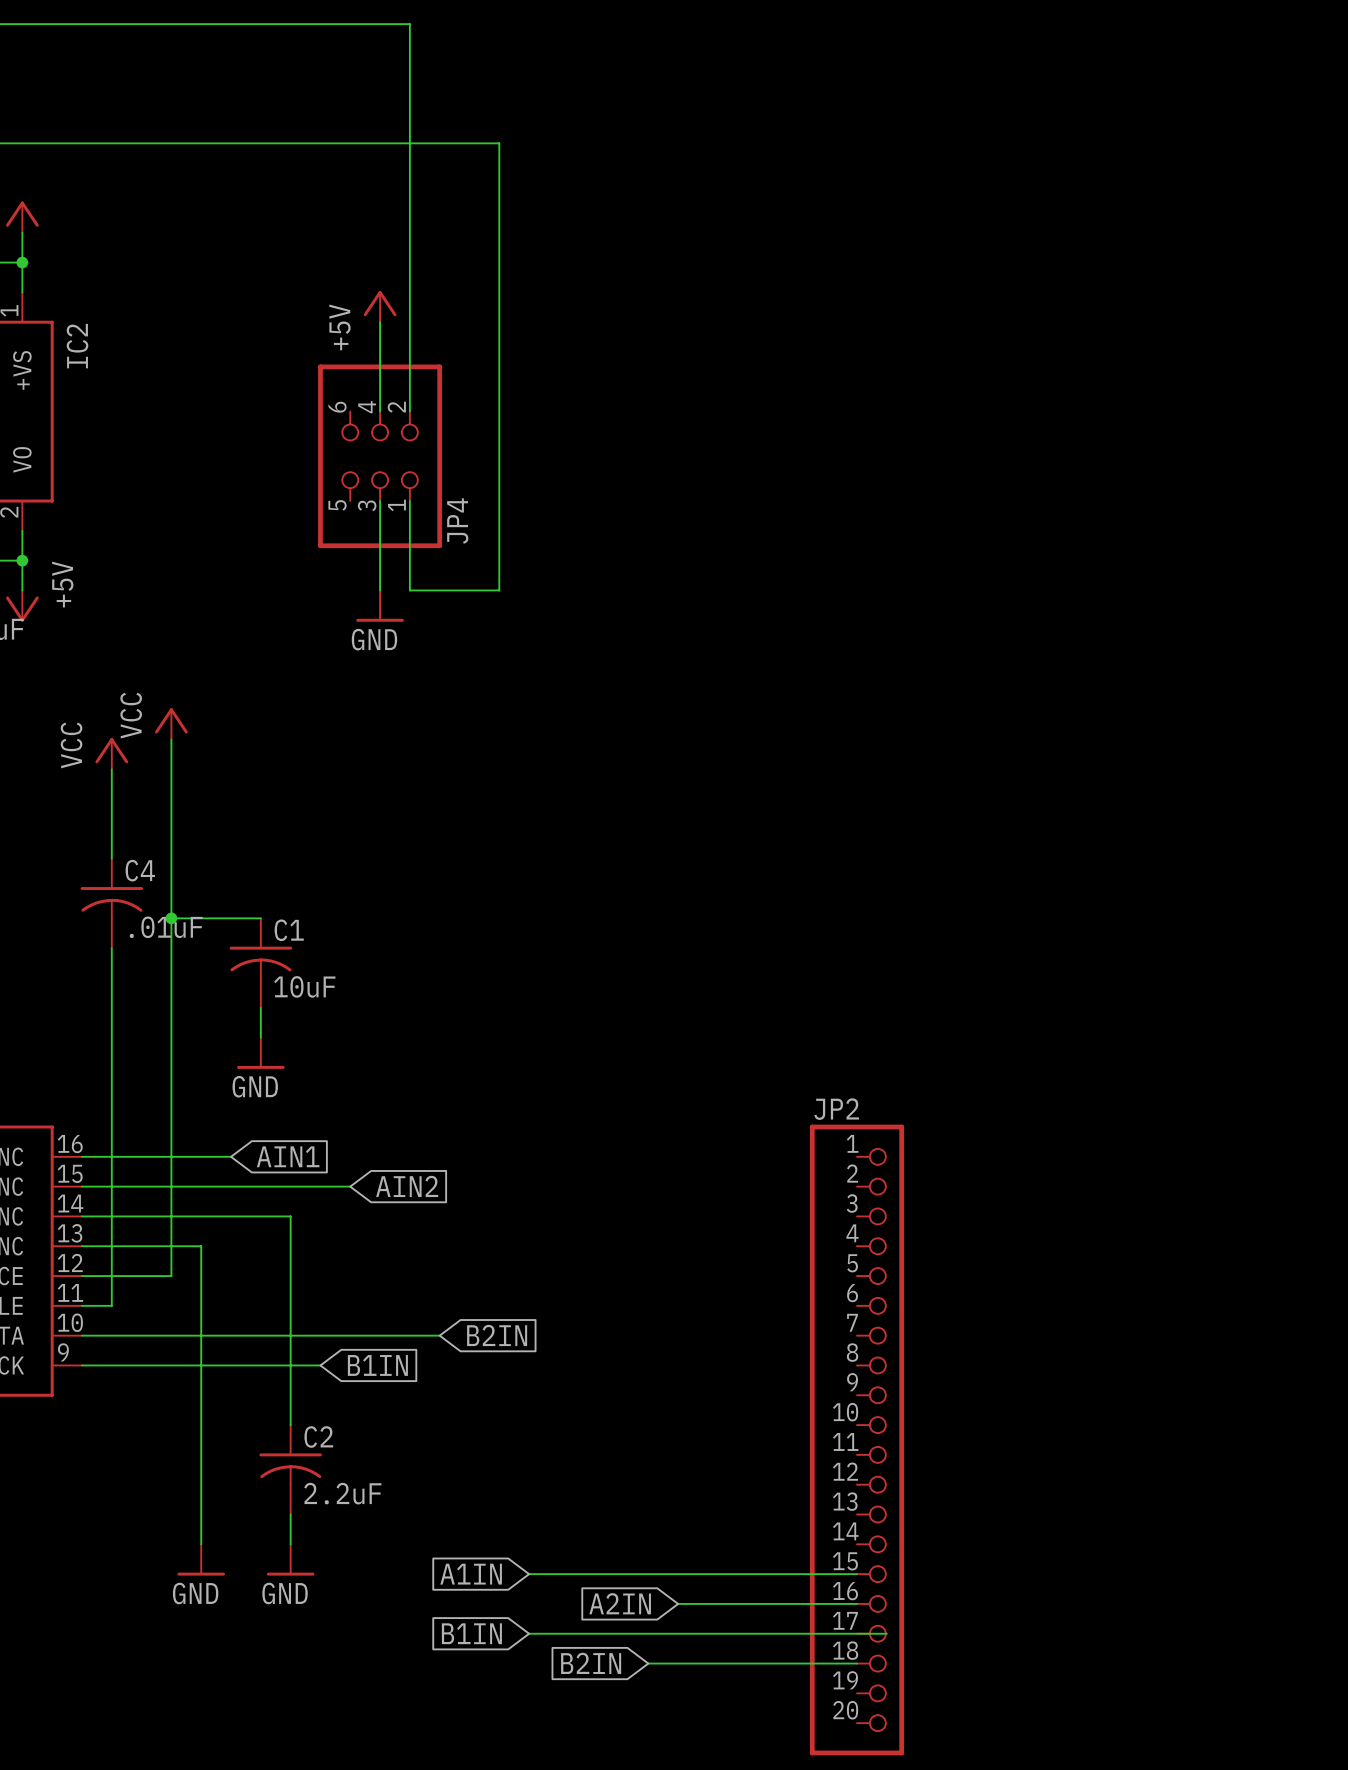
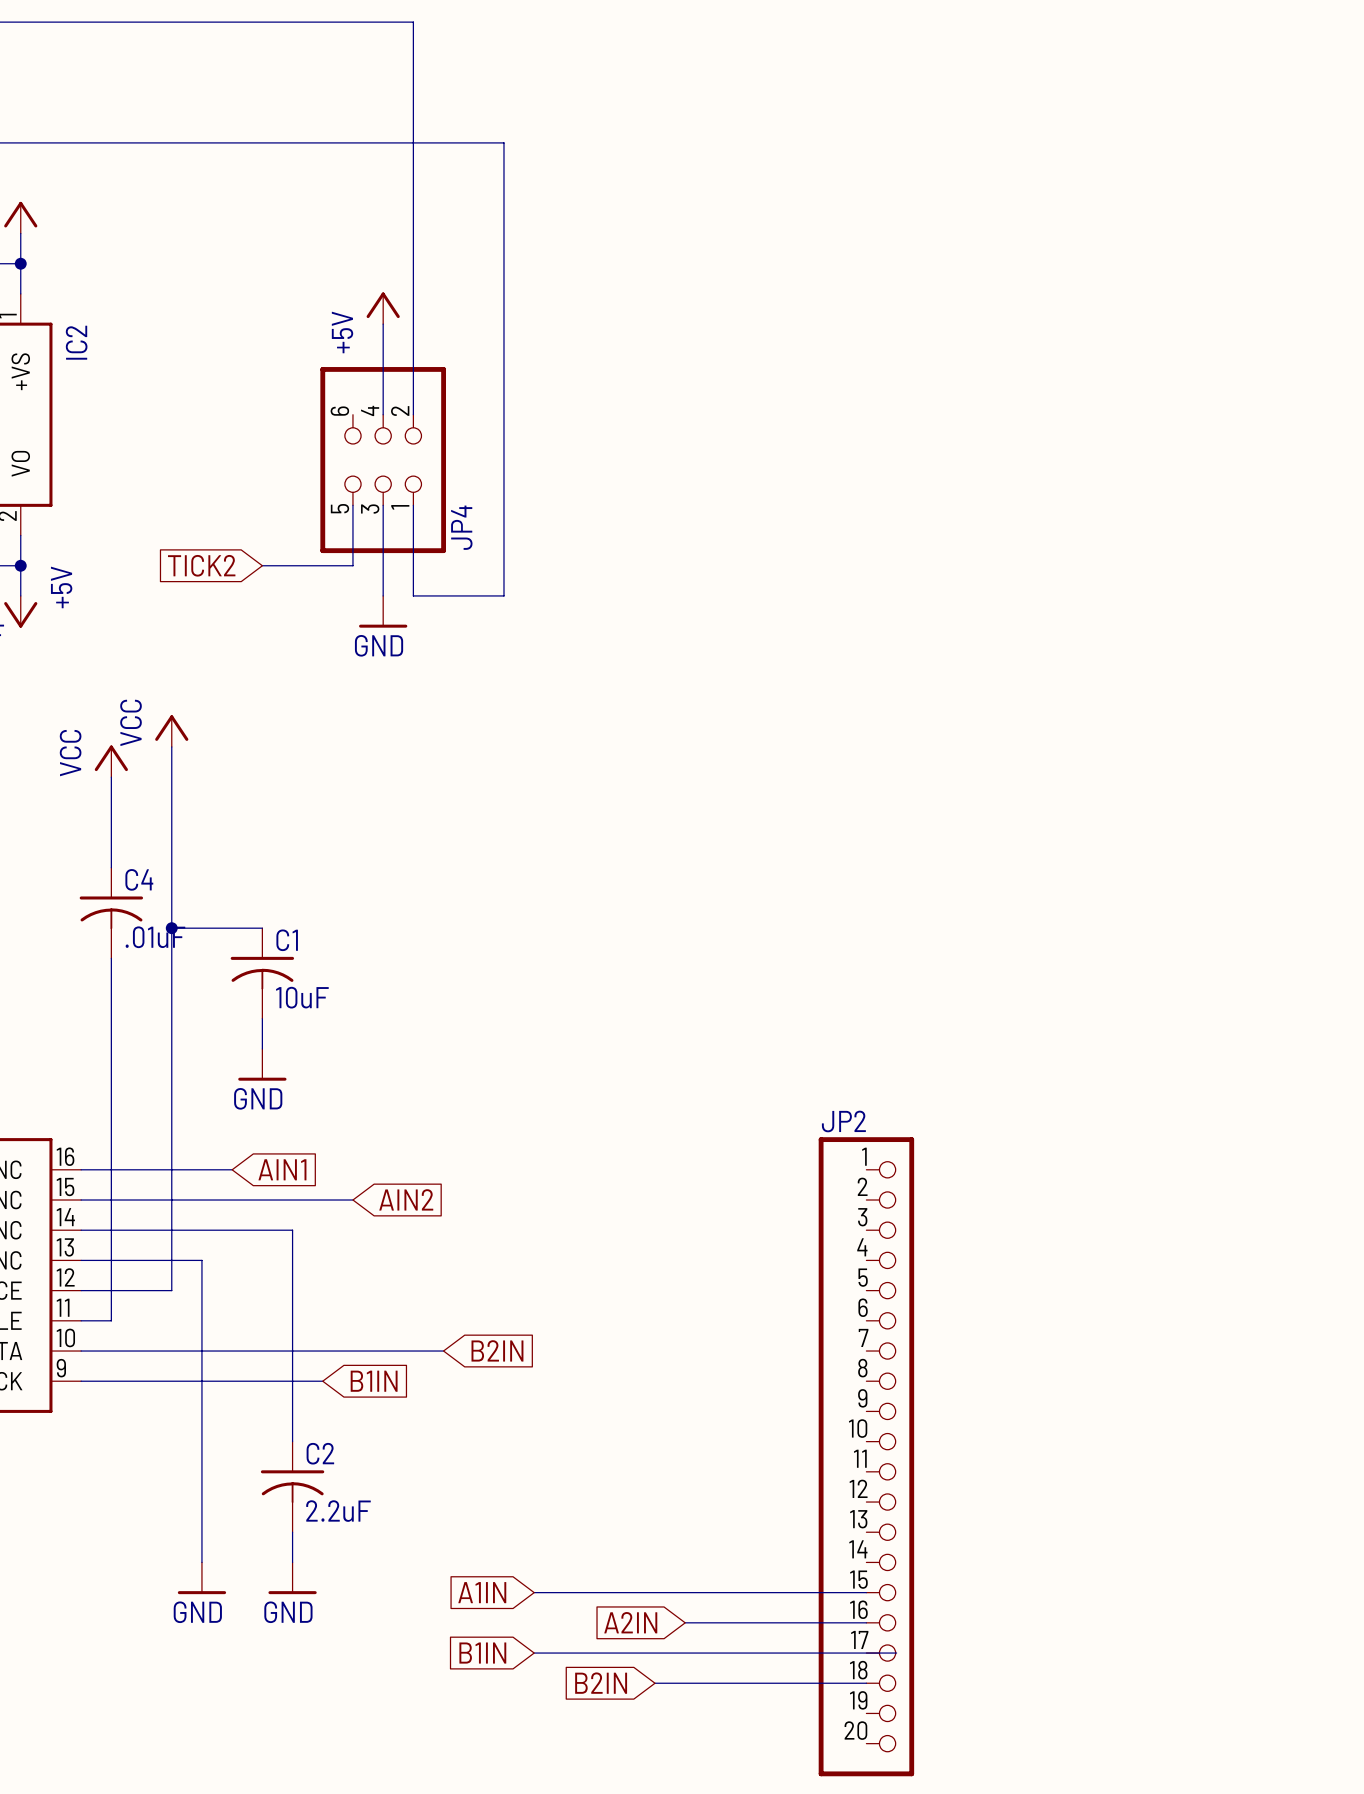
wire: none -> (352, 505) (352, 565) (262, 565)
global label: none -> TICK2 (201, 565)

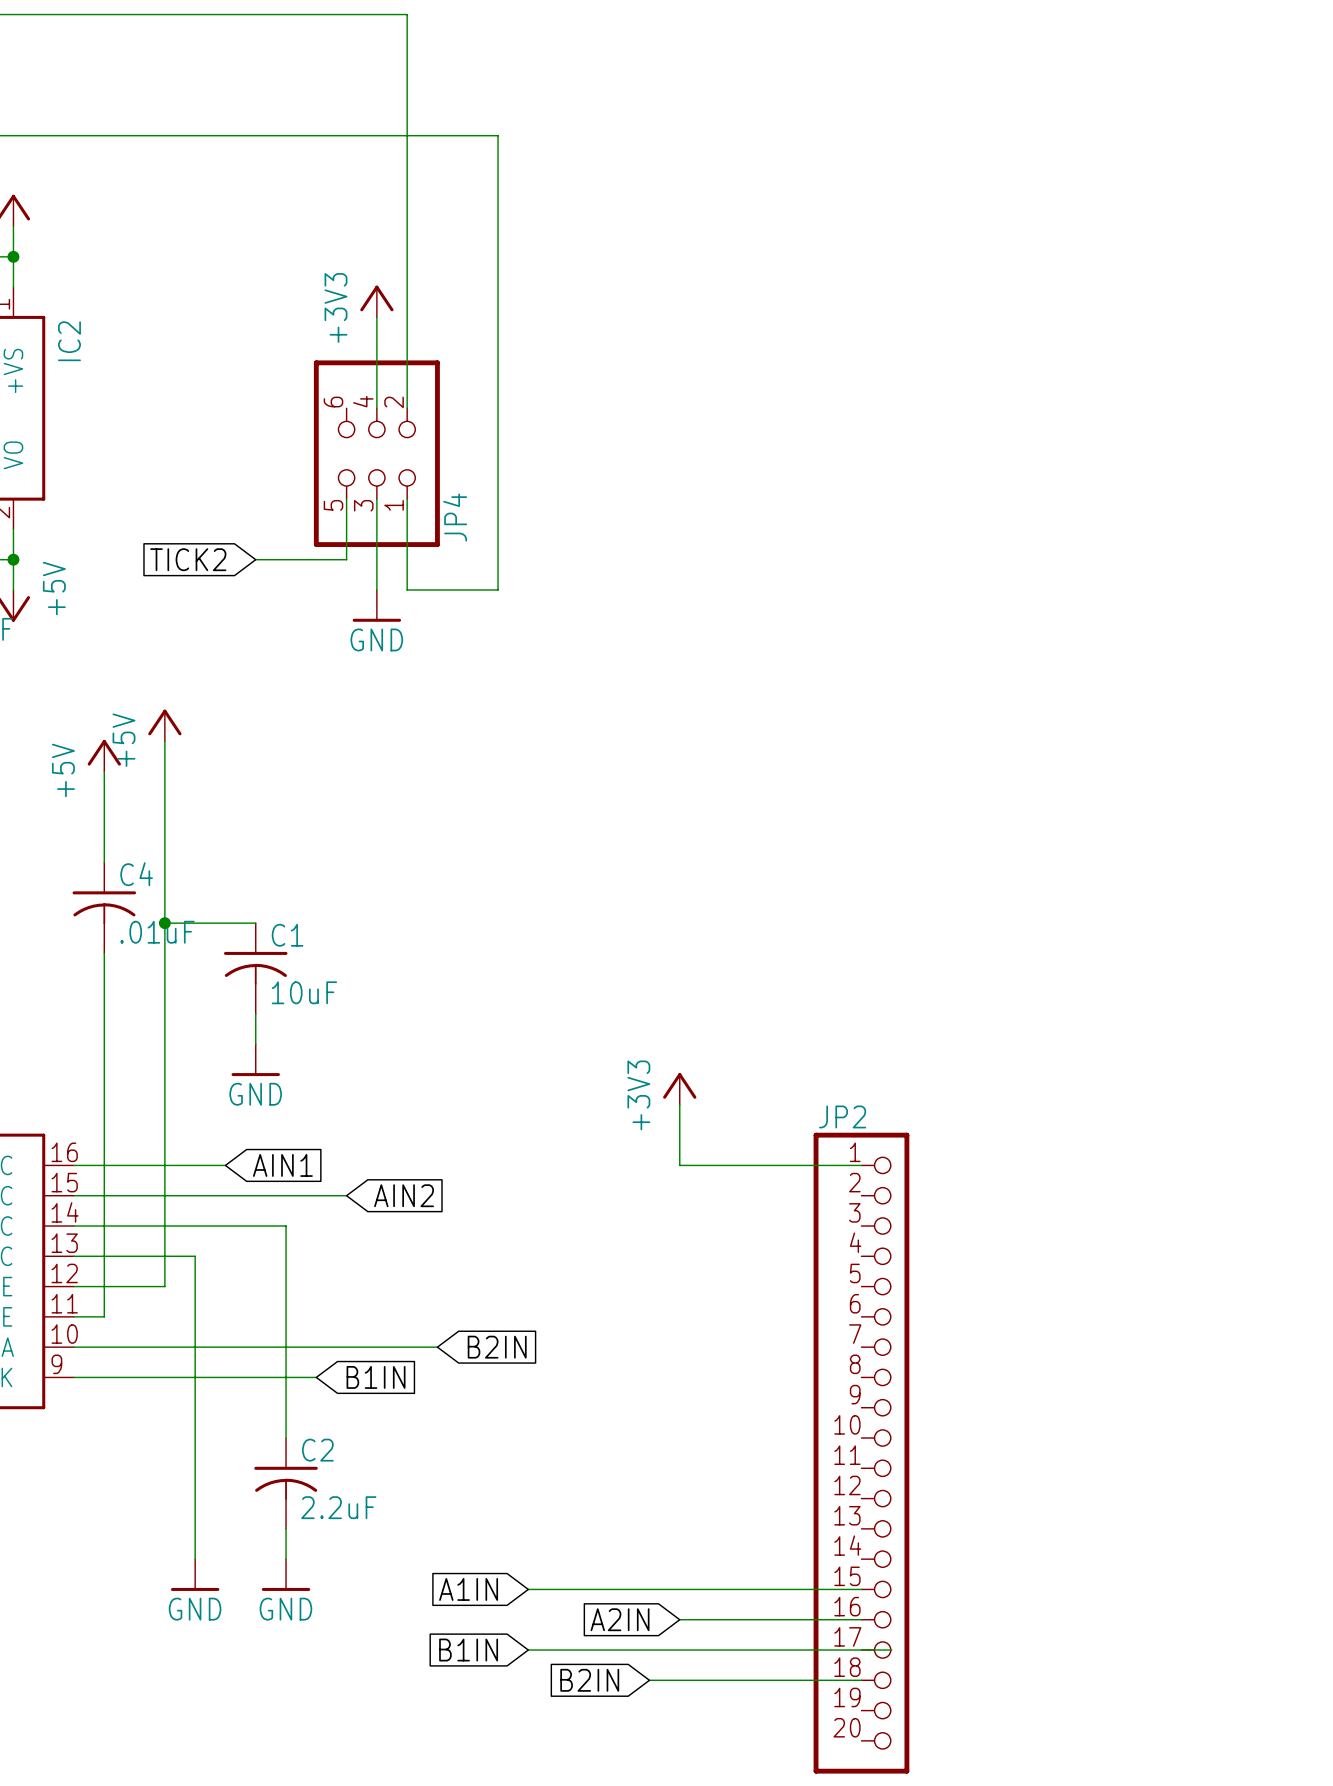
power symbol: +5V (383, 308) -> +3V3 (376, 301)
power symbol: VCC (171, 731) -> +5V (164, 725)
power symbol: VCC (111, 761) -> +5V (104, 755)
power symbol: none -> +3V3 (679, 1088)
wire: none -> (679, 1104) (679, 1165) (861, 1165)

